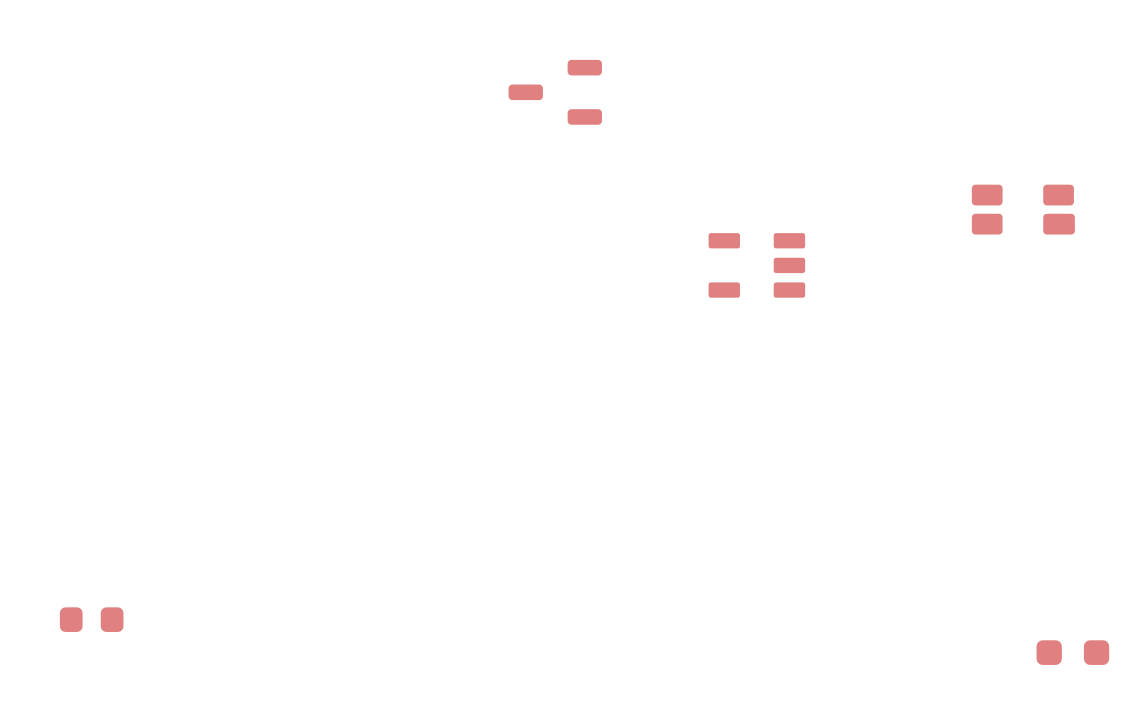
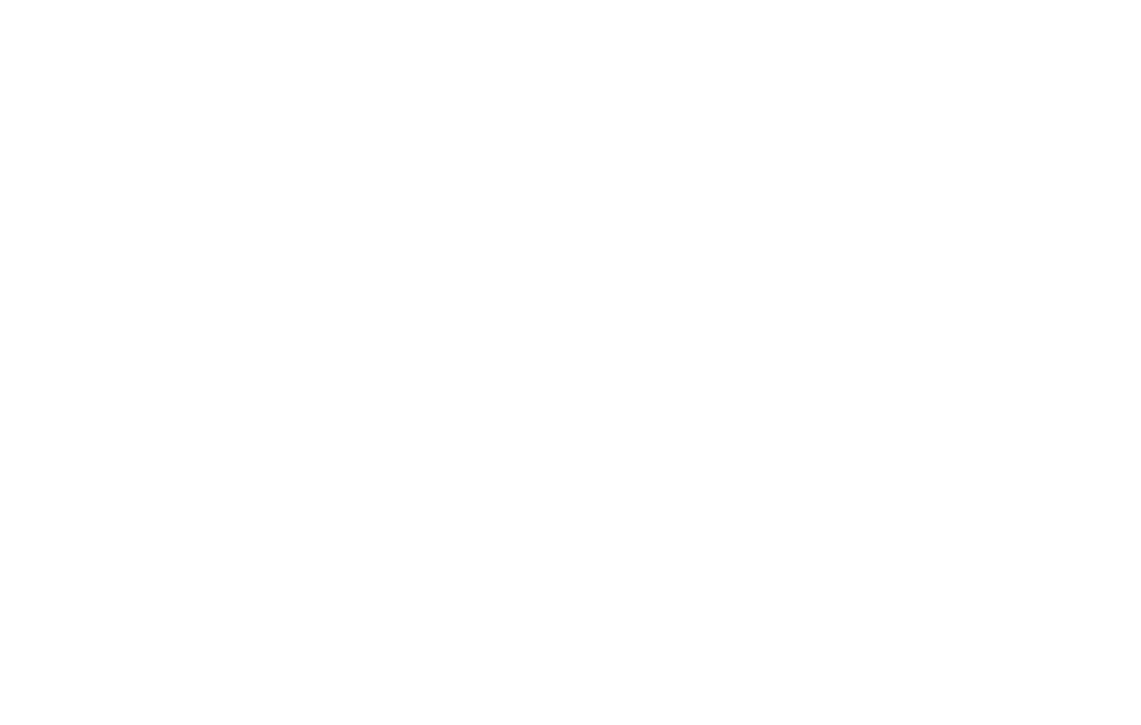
part: (555, 92) -> none
part: (1023, 209) -> none
part: (756, 265) -> none
part: (91, 619) -> none
part: (1072, 652) -> none

